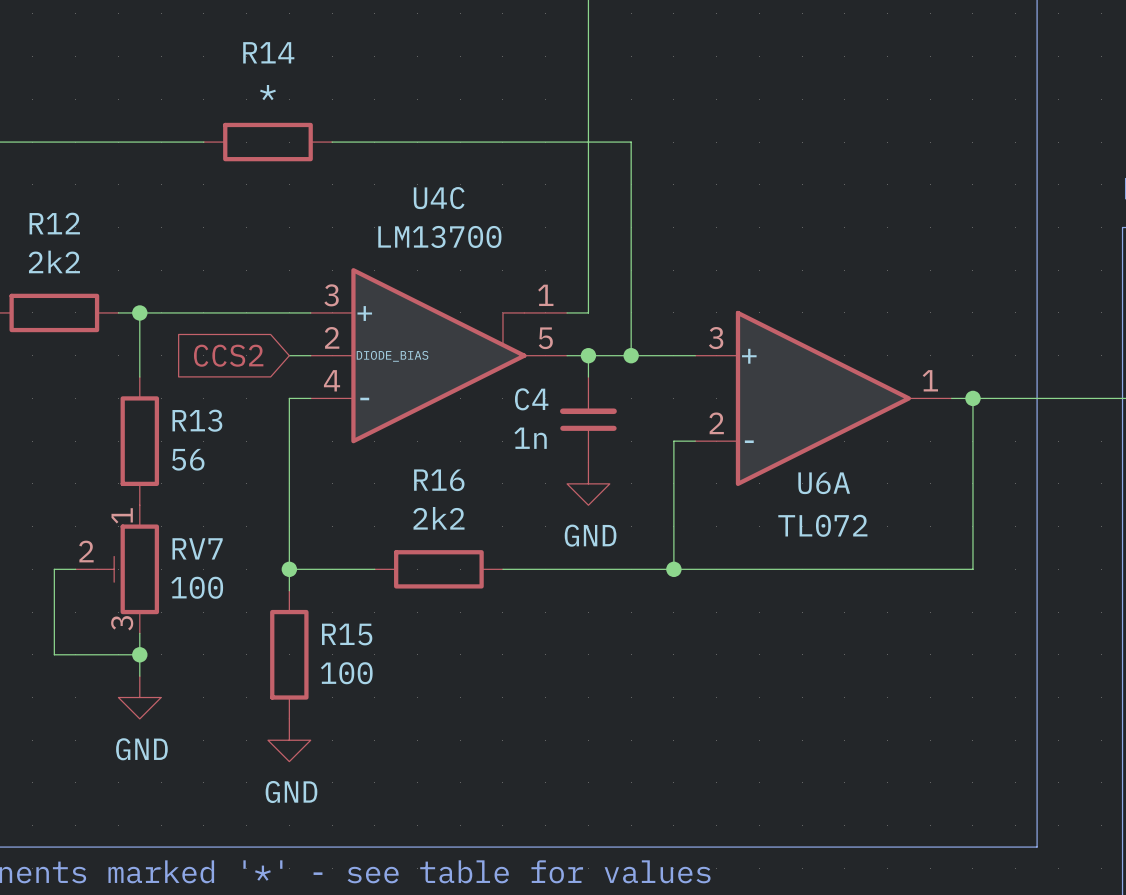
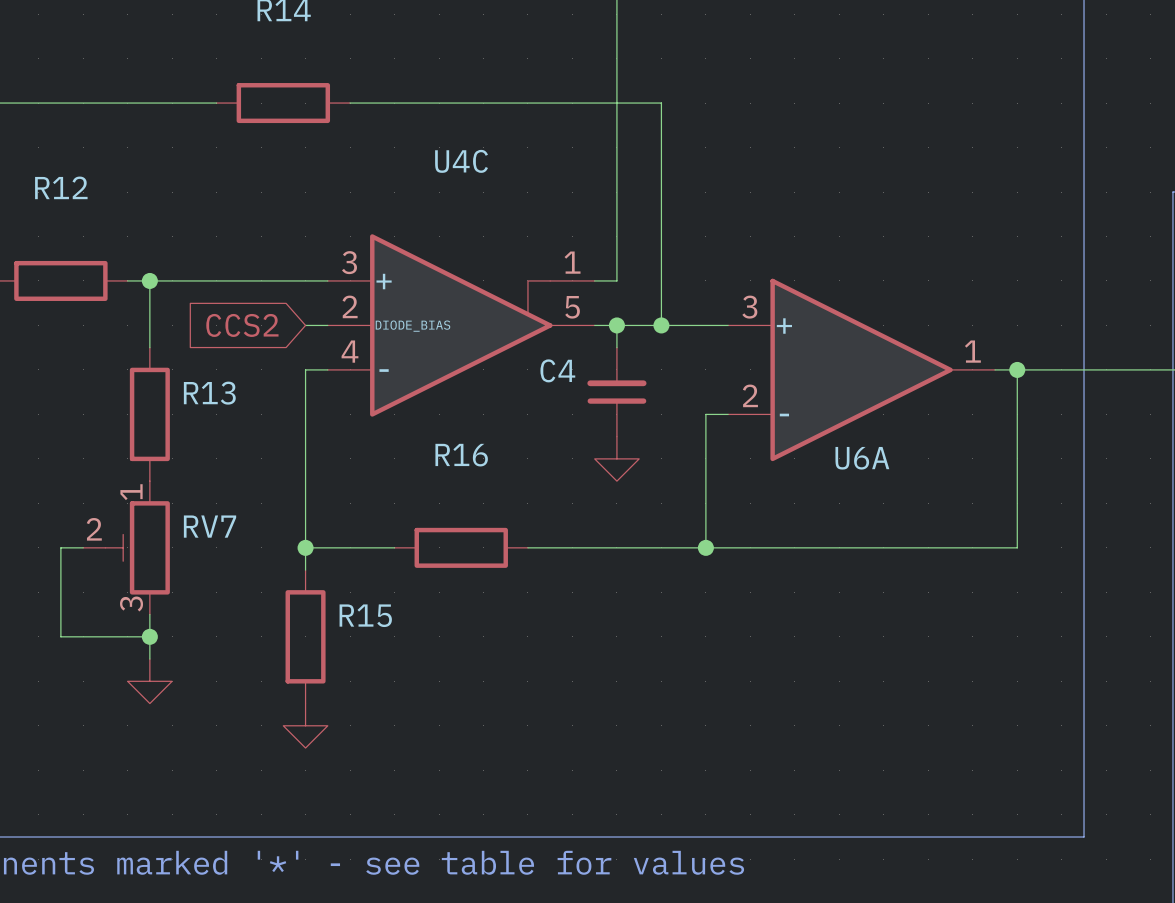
R14 value: * (267, 92) -> none
U4C value: LM13700 (439, 236) -> none
R12 value: 2k2 (54, 261) -> none
C4 value: 1n (530, 438) -> none
R13 value: 56 (188, 459) -> none
R16 value: 2k2 (438, 518) -> none
U6A value: TL072 (822, 525) -> none
power symbol text: GND (590, 535) -> none
RV7 value: 100 (197, 587) -> none
R15 value: 100 (346, 673) -> none
power symbol text: GND (141, 749) -> none
power symbol text: GND (291, 792) -> none

